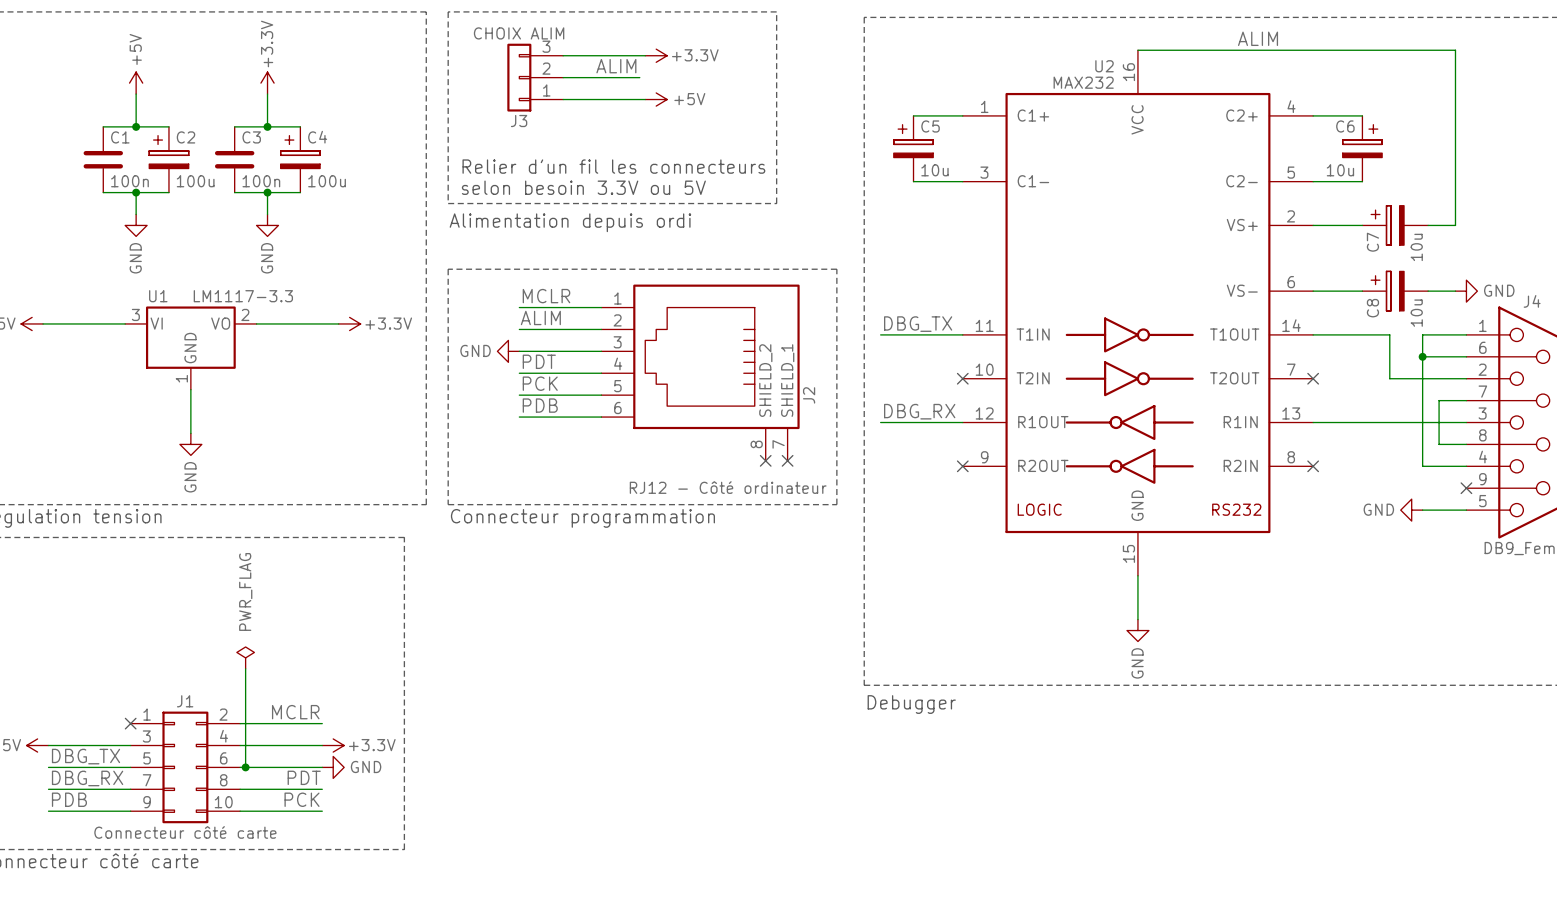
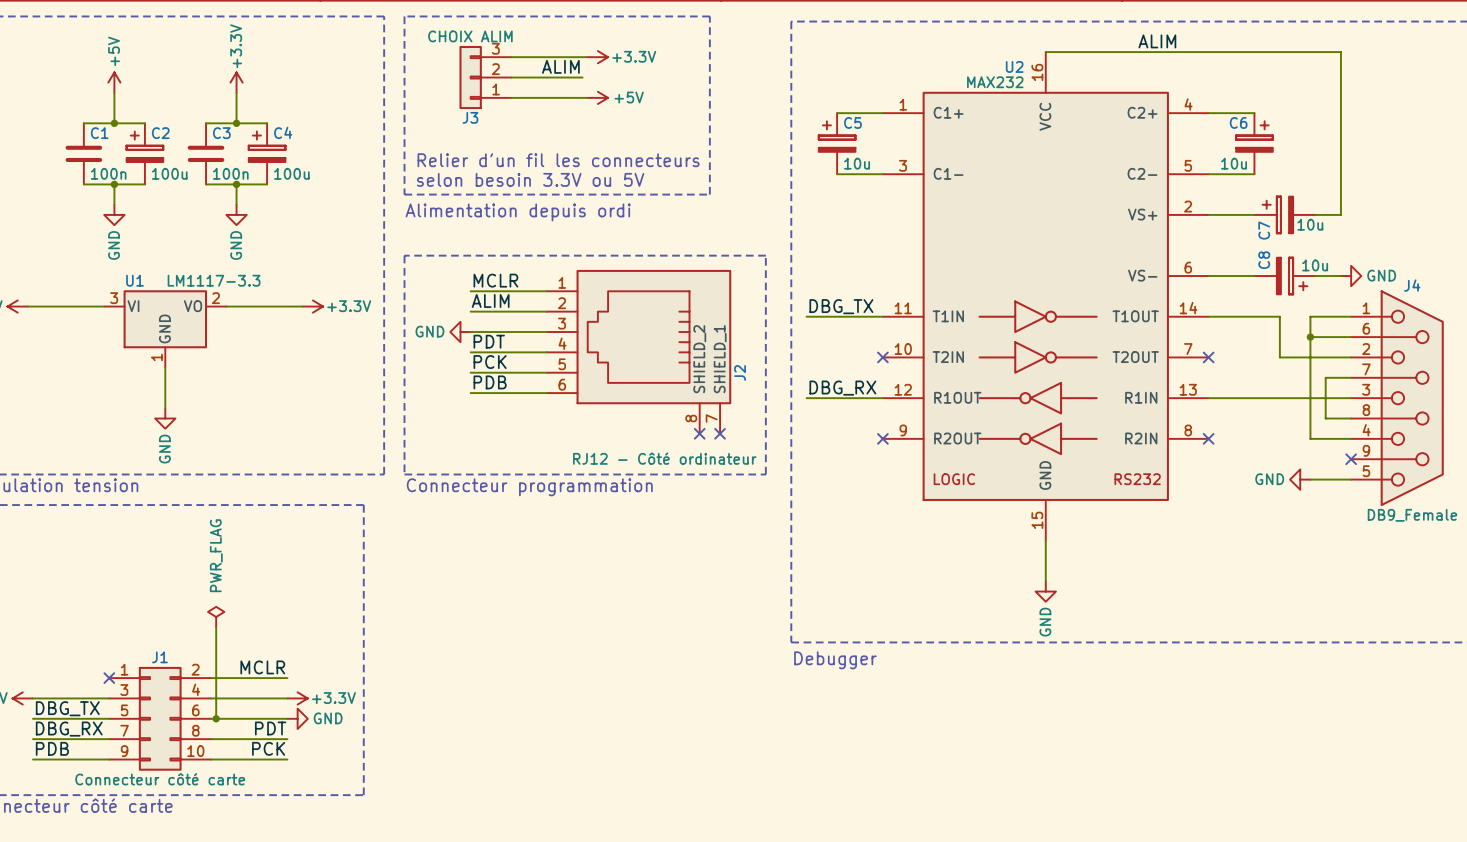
C7 value rotation: 0° (1416, 247) -> 90° clockwise (1310, 224)
C8 rotation: 0° (1387, 291) -> 180° (1292, 276)
C8 name position: C8 (1372, 308) -> C8 (1264, 260)
C8 value position: 10u (1416, 313) -> 10u (1315, 265)

